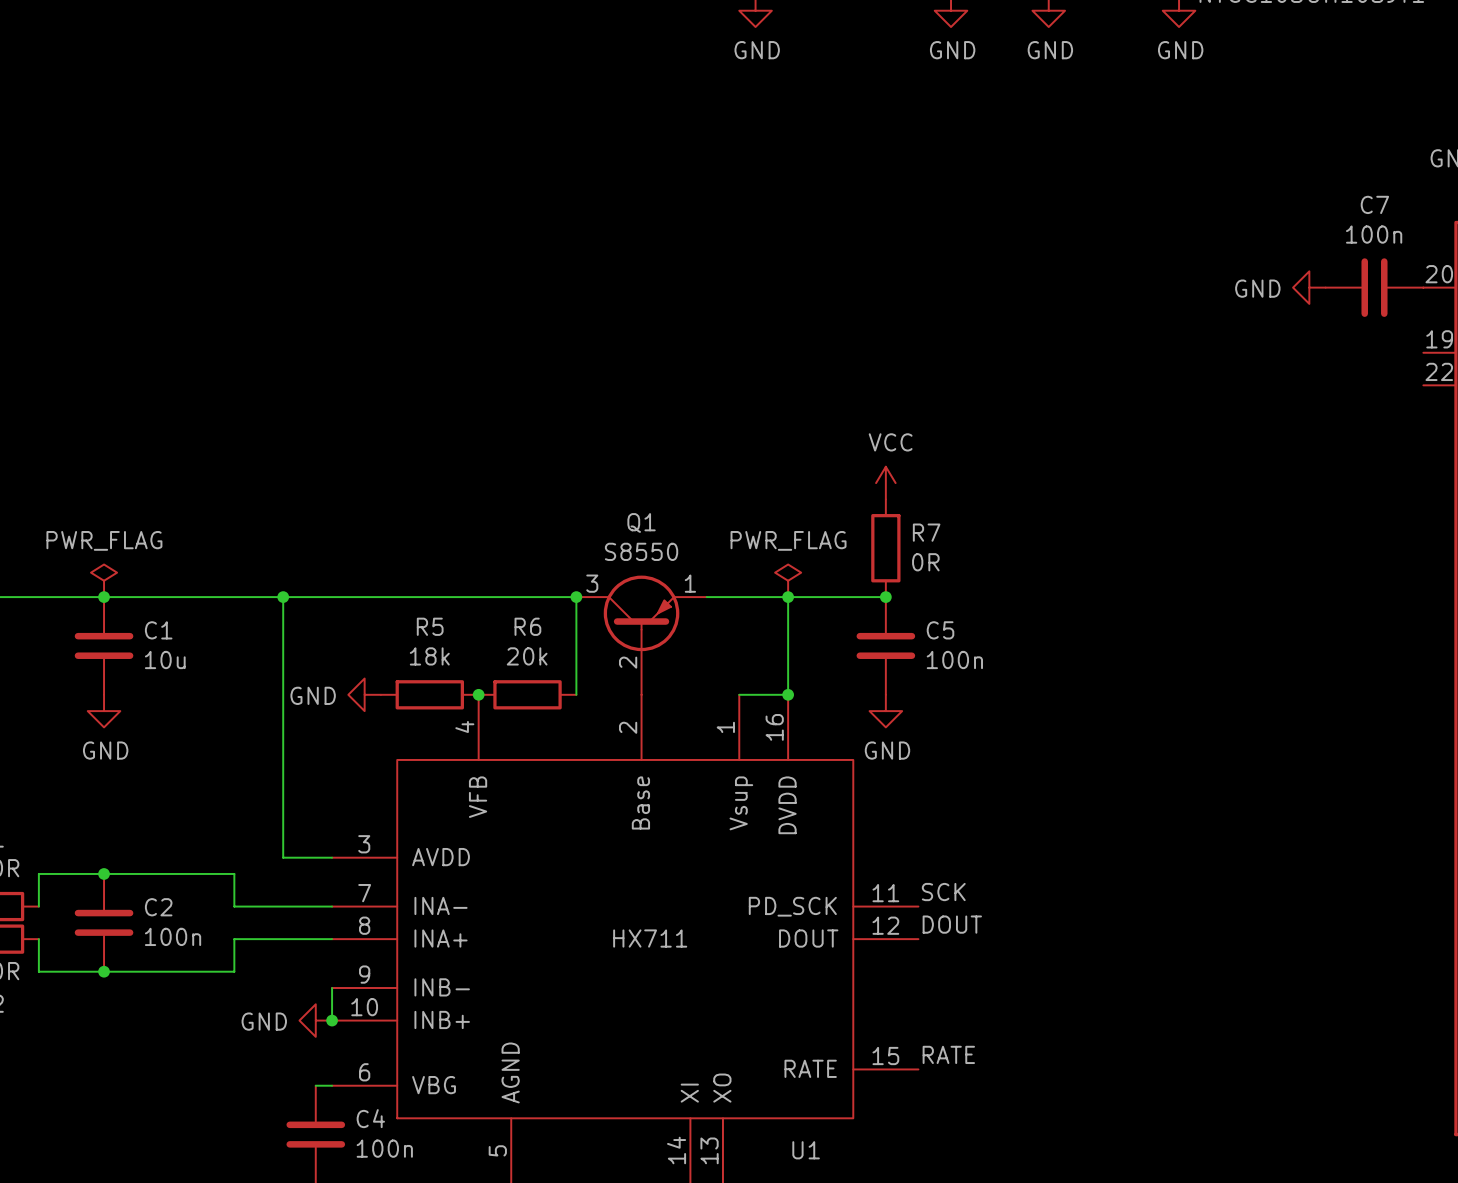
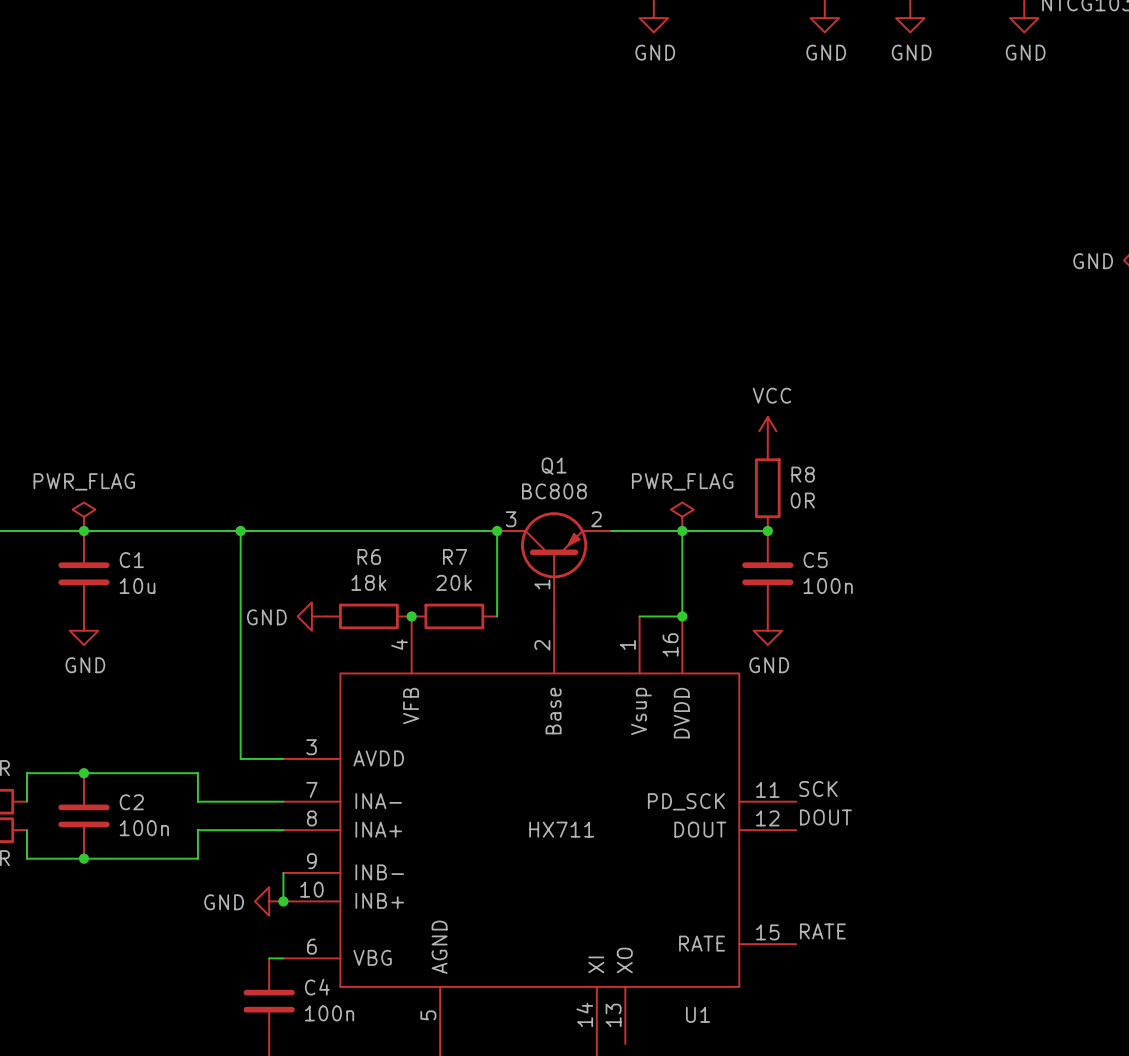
R7 name: R7 (926, 532) -> R8 (803, 474)
Q1 value: S8550 (641, 551) -> BC808 (554, 491)
Q1 symbol: [576, 575, 707, 695] -> [497, 512, 612, 617]
R5 name: R5 (430, 626) -> R6 (369, 556)
R6 name: R6 (527, 626) -> R7 (455, 556)

